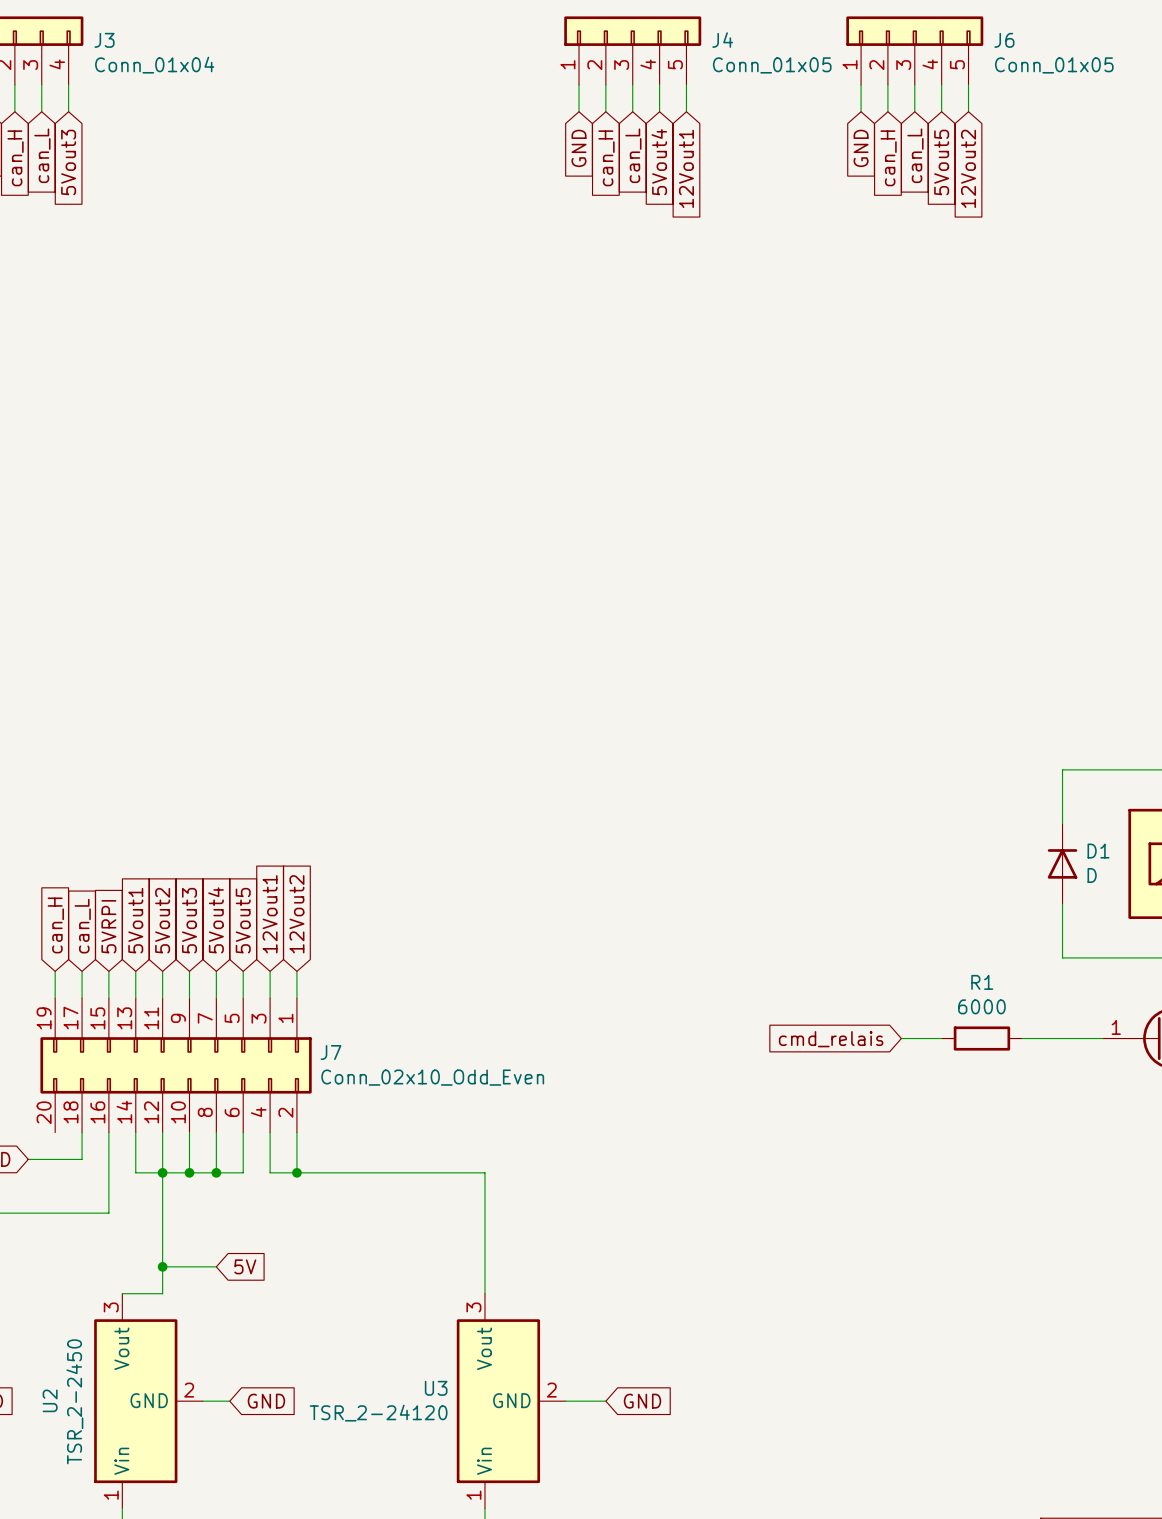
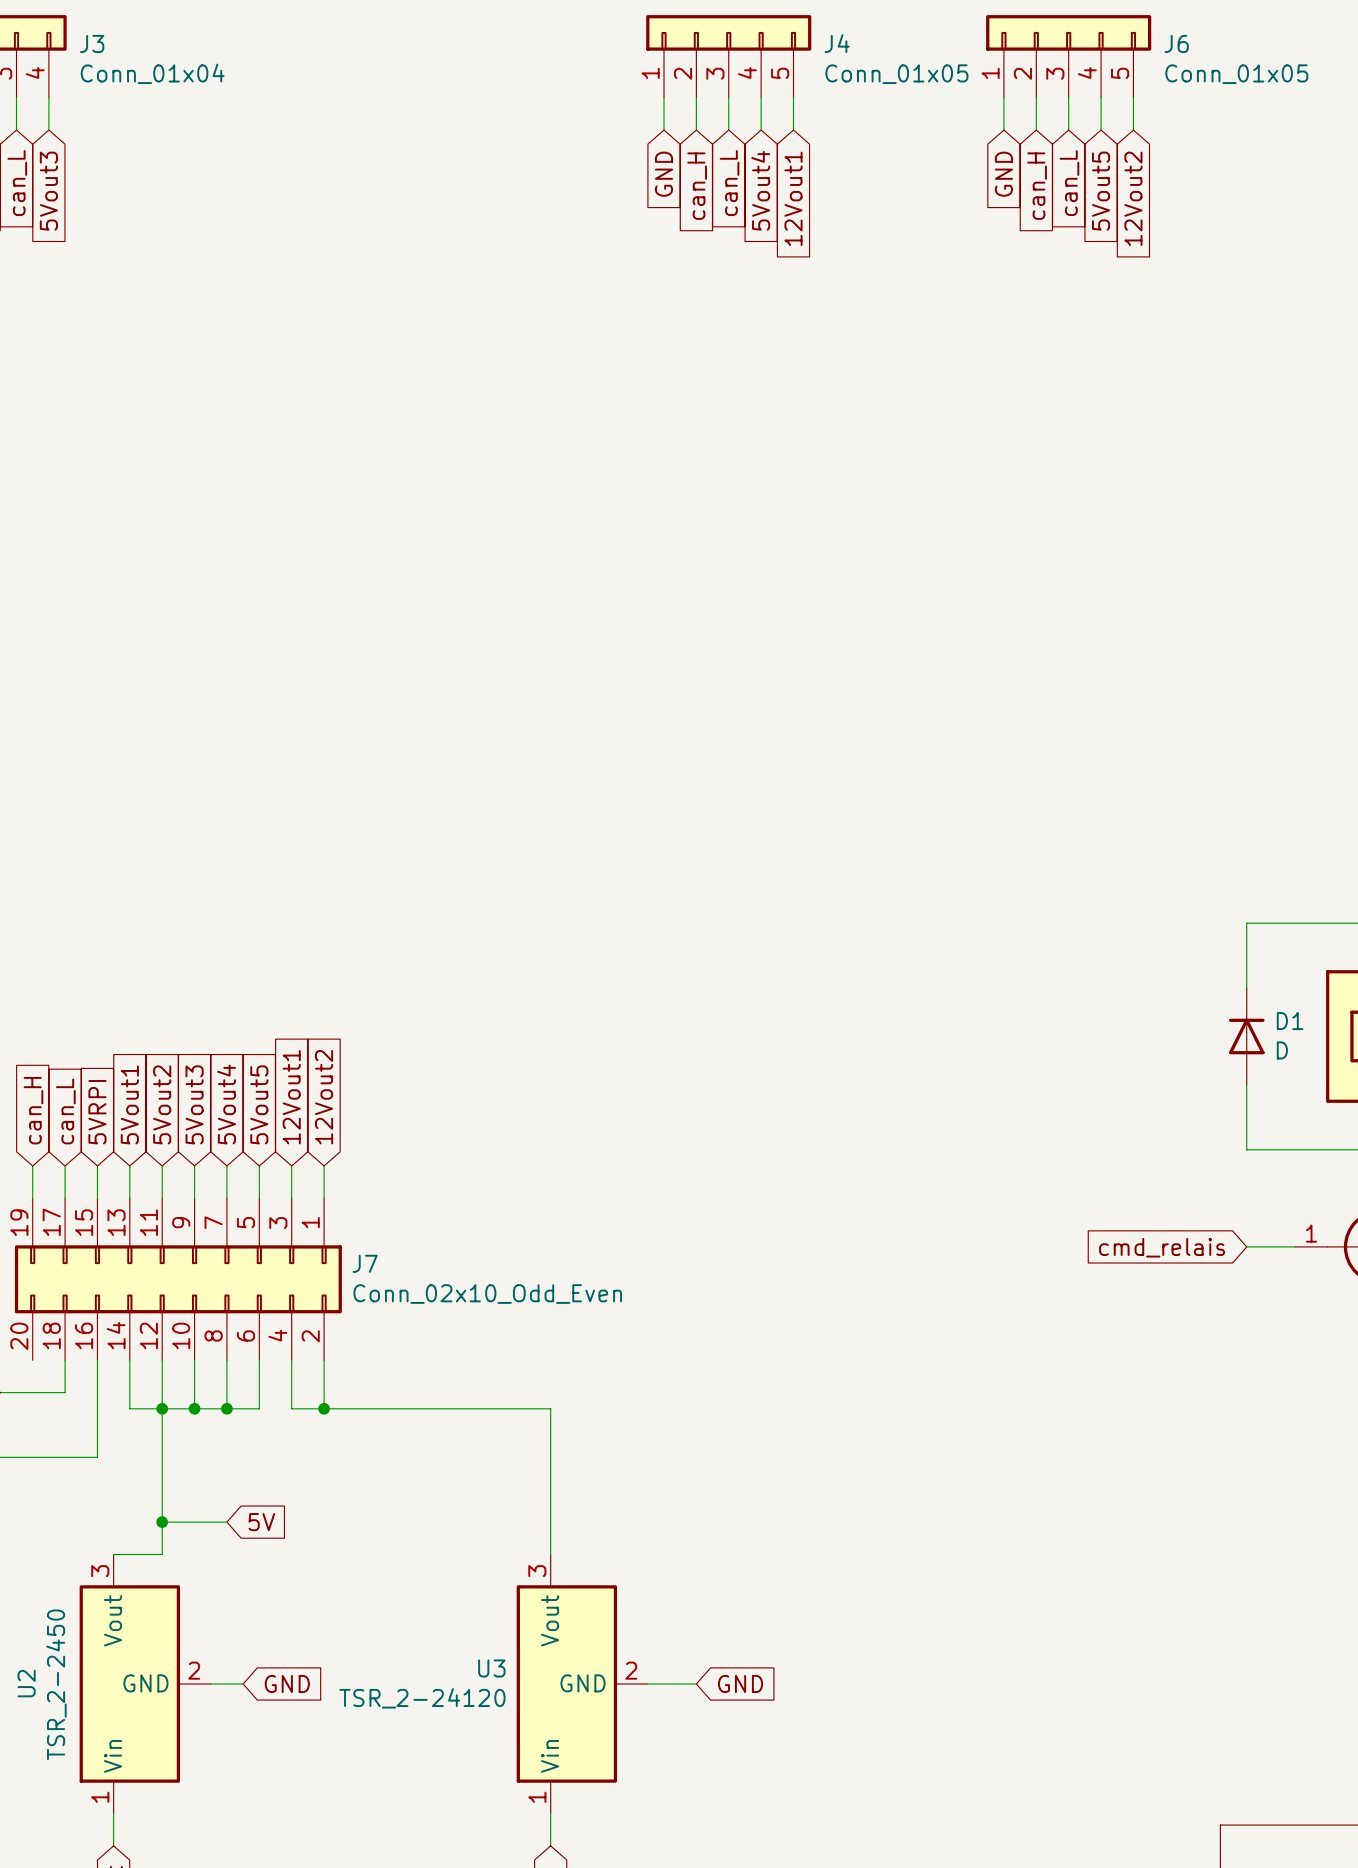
wire: (901, 1038) (941, 1038) -> none
R1: 6000 (981, 1038) -> none
wire: (1022, 1038) (1062, 1038) -> none
global label position: cmd_relais (831, 1039) -> cmd_relais (1162, 1247)

